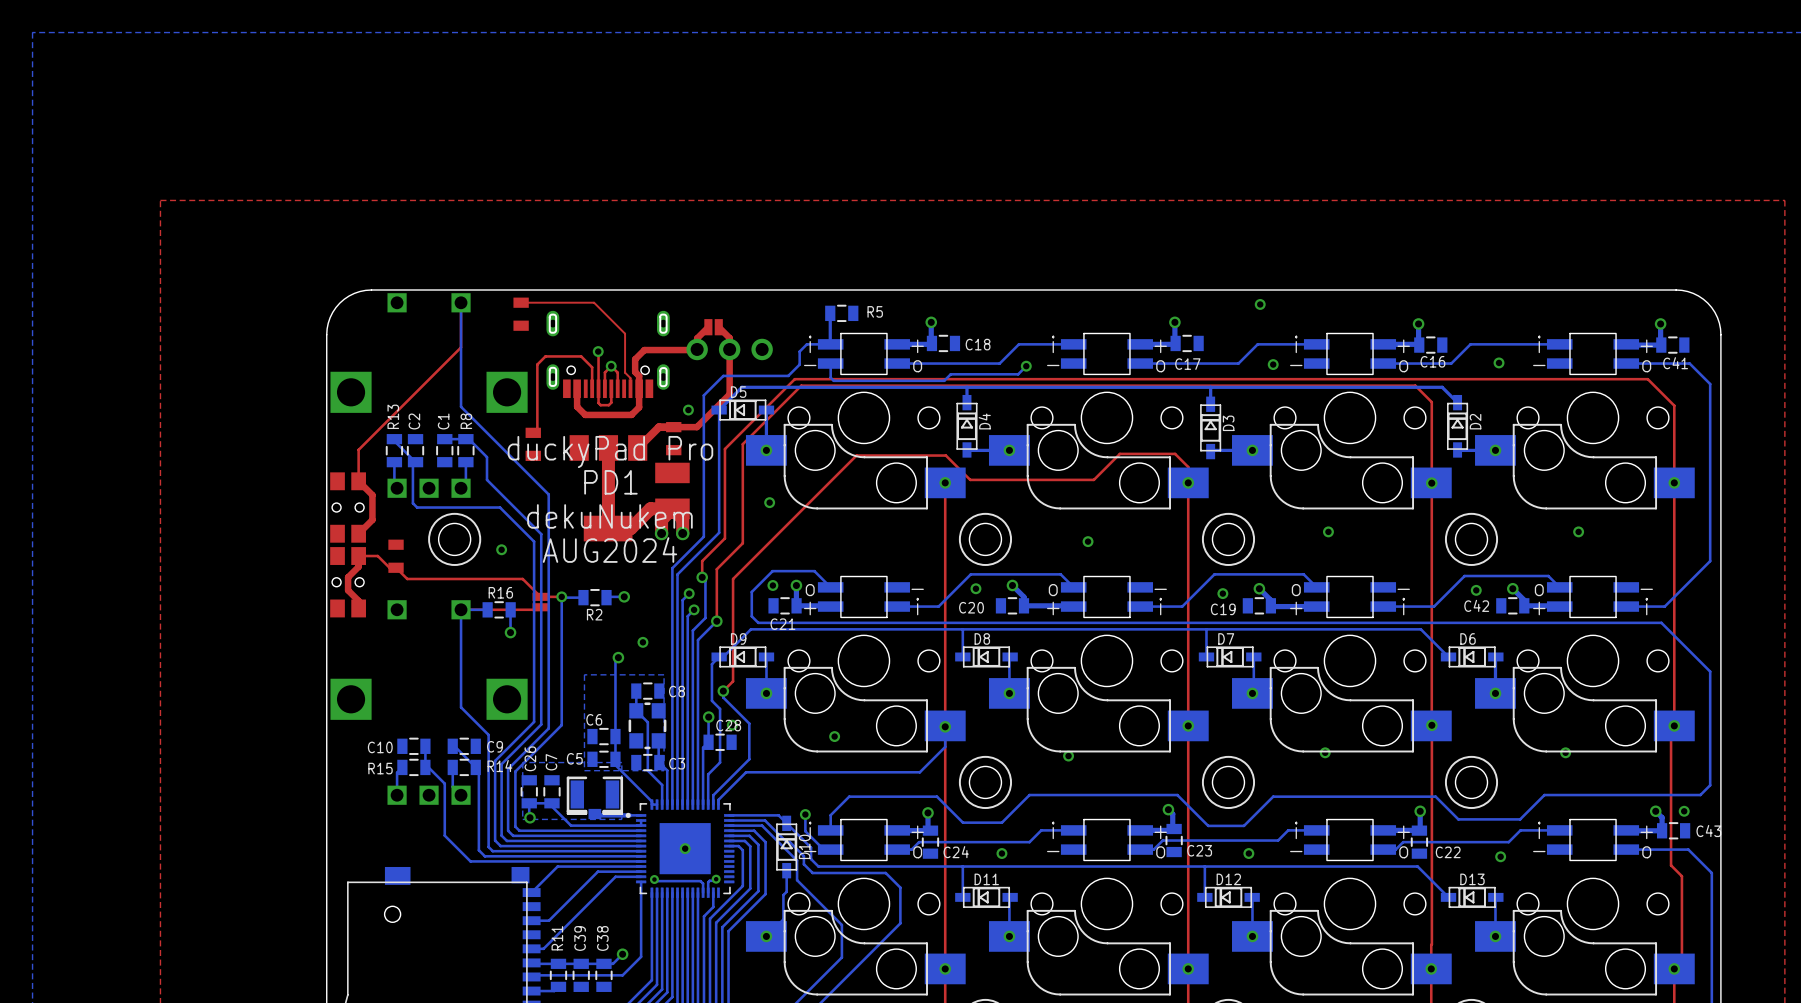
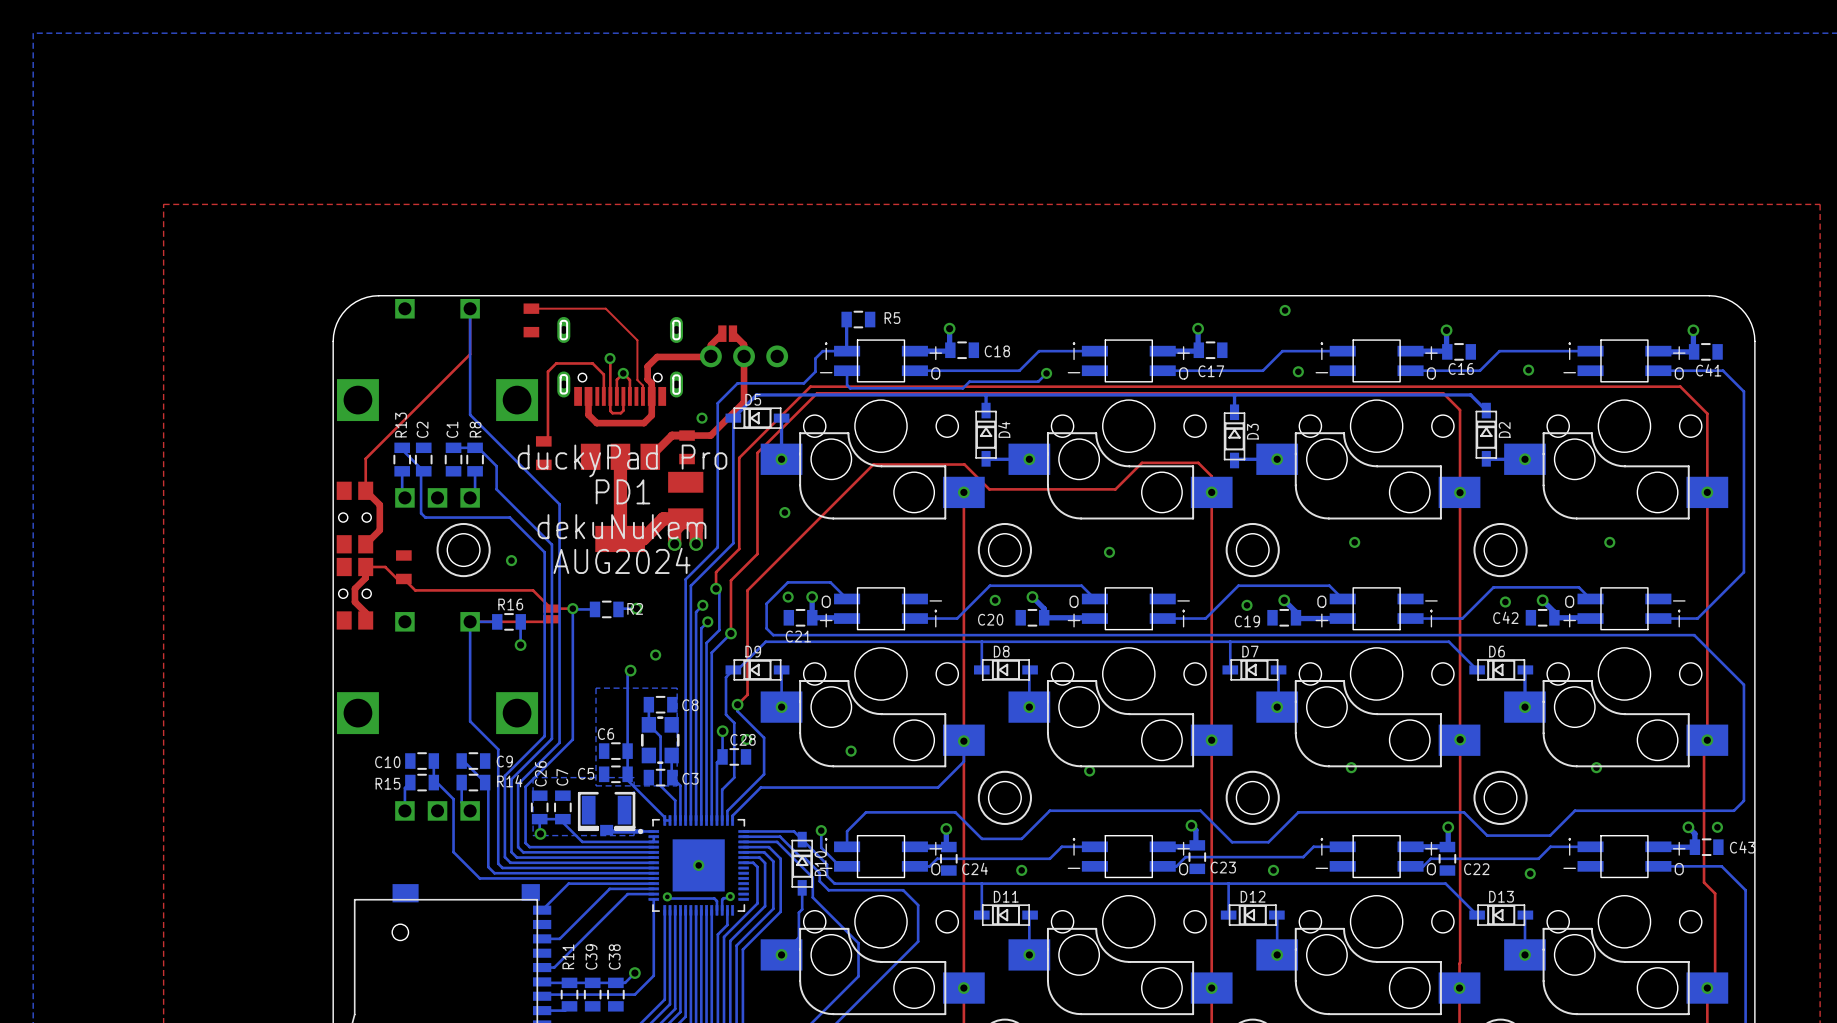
R2 name position: R2 (594, 614) -> R2 (635, 608)

